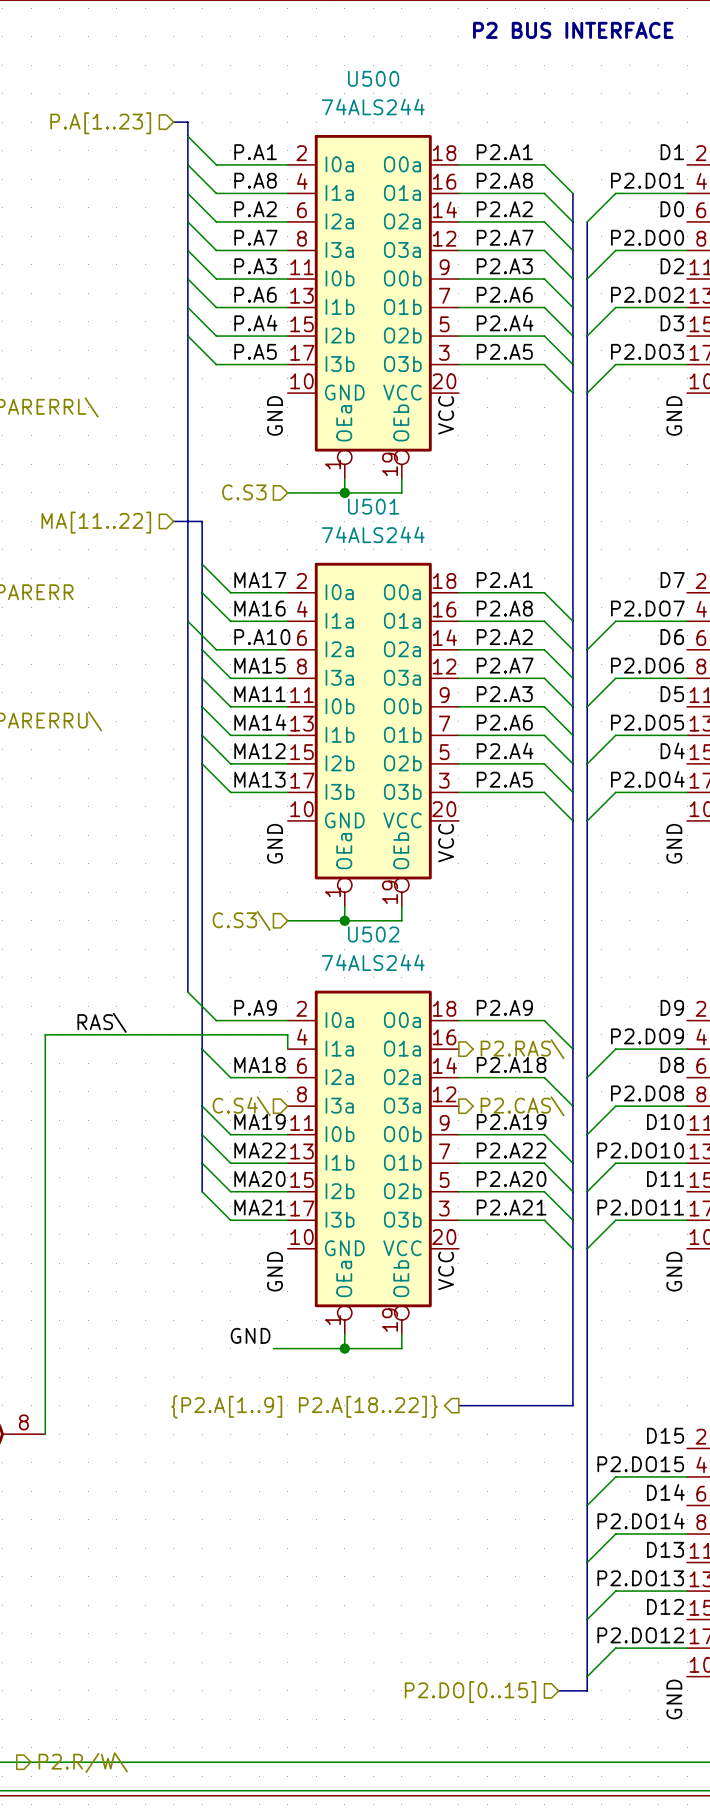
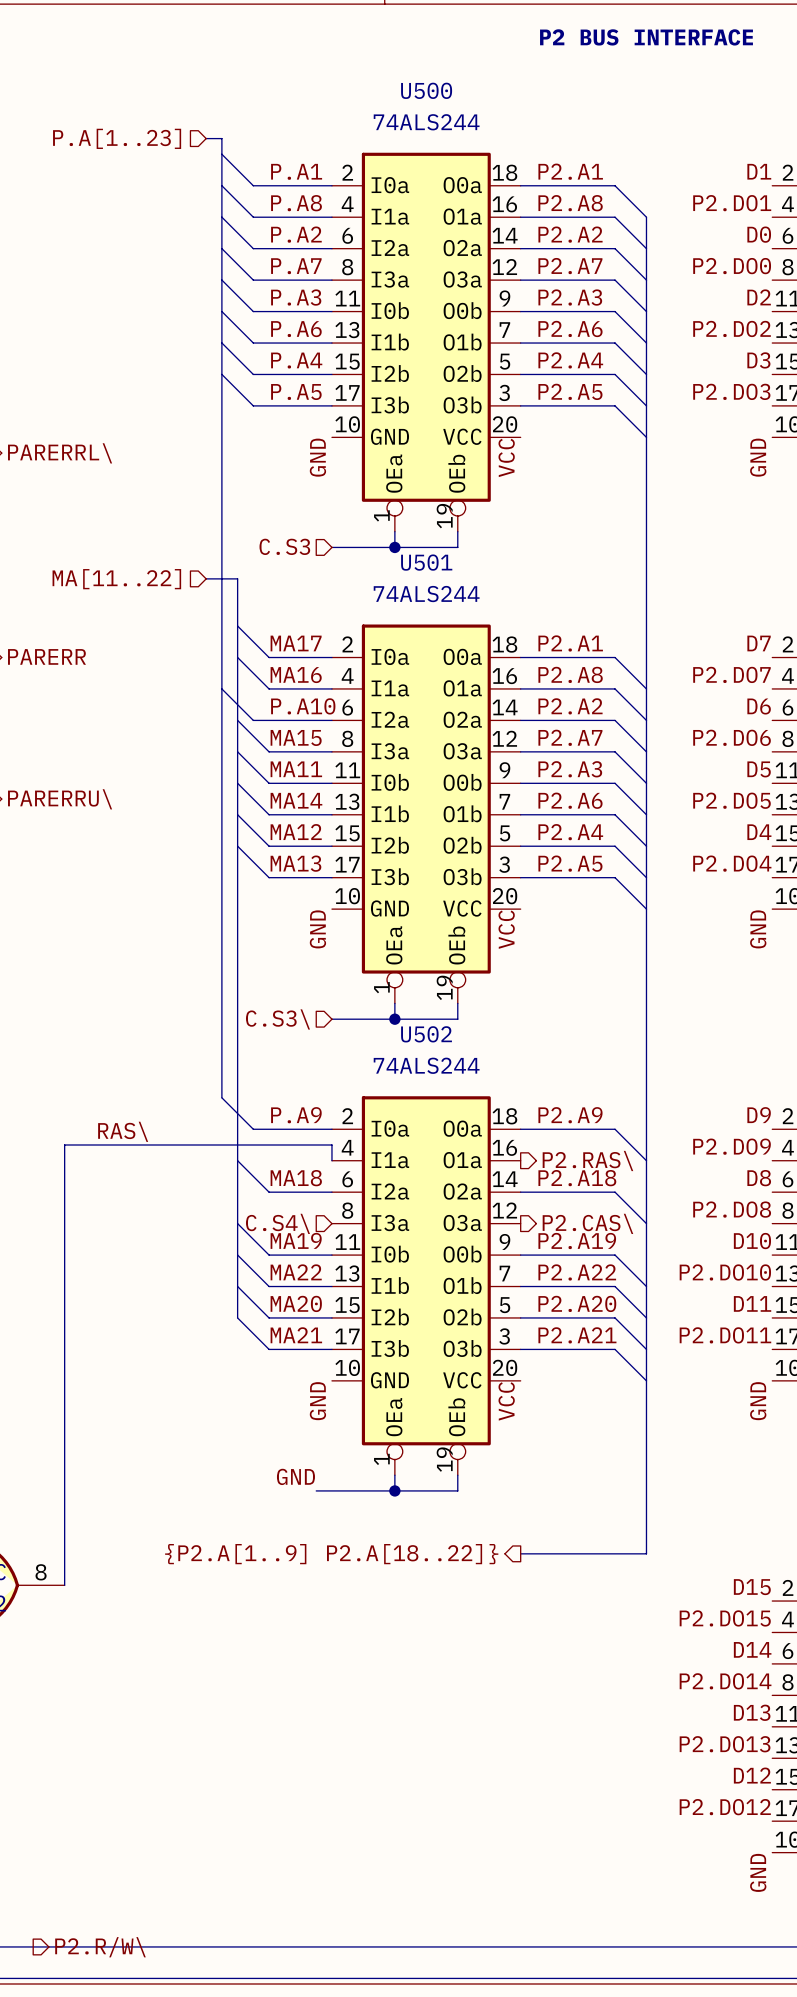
wire: (687, 193) (615, 193) (587, 221) -> none
bus: (587, 221) (587, 1690) (558, 1690) -> none
wire: (687, 250) (615, 250) (587, 279) -> none
wire: (687, 307) (615, 307) (587, 336) -> none
wire: (687, 364) (615, 364) (587, 393) -> none
wire: (687, 621) (615, 621) (587, 649) -> none
wire: (687, 678) (615, 678) (587, 706) -> none
wire: (687, 735) (615, 735) (587, 763) -> none
wire: (687, 792) (615, 792) (587, 820) -> none
wire: (687, 1049) (615, 1049) (587, 1077) -> none
wire: (687, 1106) (615, 1106) (587, 1134) -> none
wire: (687, 1163) (615, 1163) (587, 1191) -> none
wire: (687, 1220) (615, 1220) (587, 1248) -> none
wire: (687, 1476) (615, 1476) (587, 1505) -> none
wire: (687, 1534) (615, 1534) (587, 1562) -> none
wire: (687, 1591) (615, 1591) (587, 1619) -> none
wire: (687, 1648) (615, 1648) (587, 1676) -> none
hierarchical label: P2.DO[0..15] (470, 1692) -> none

